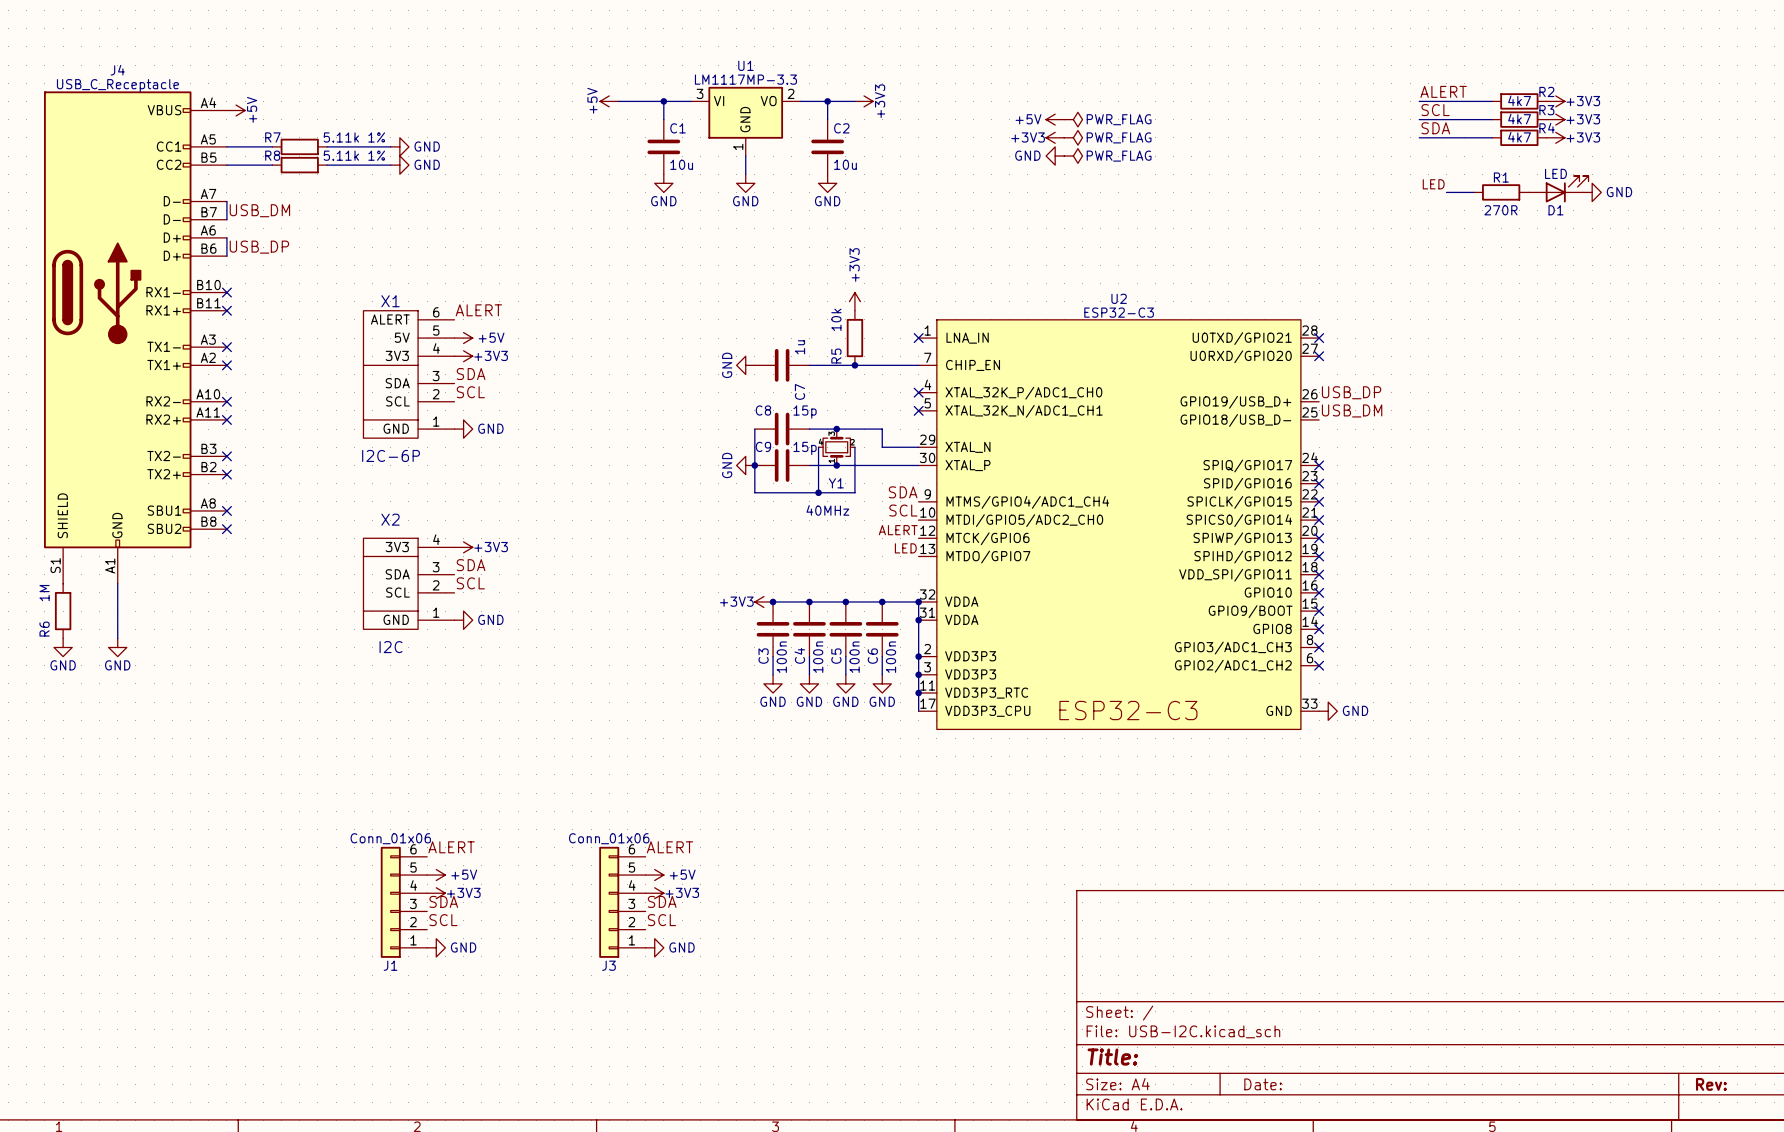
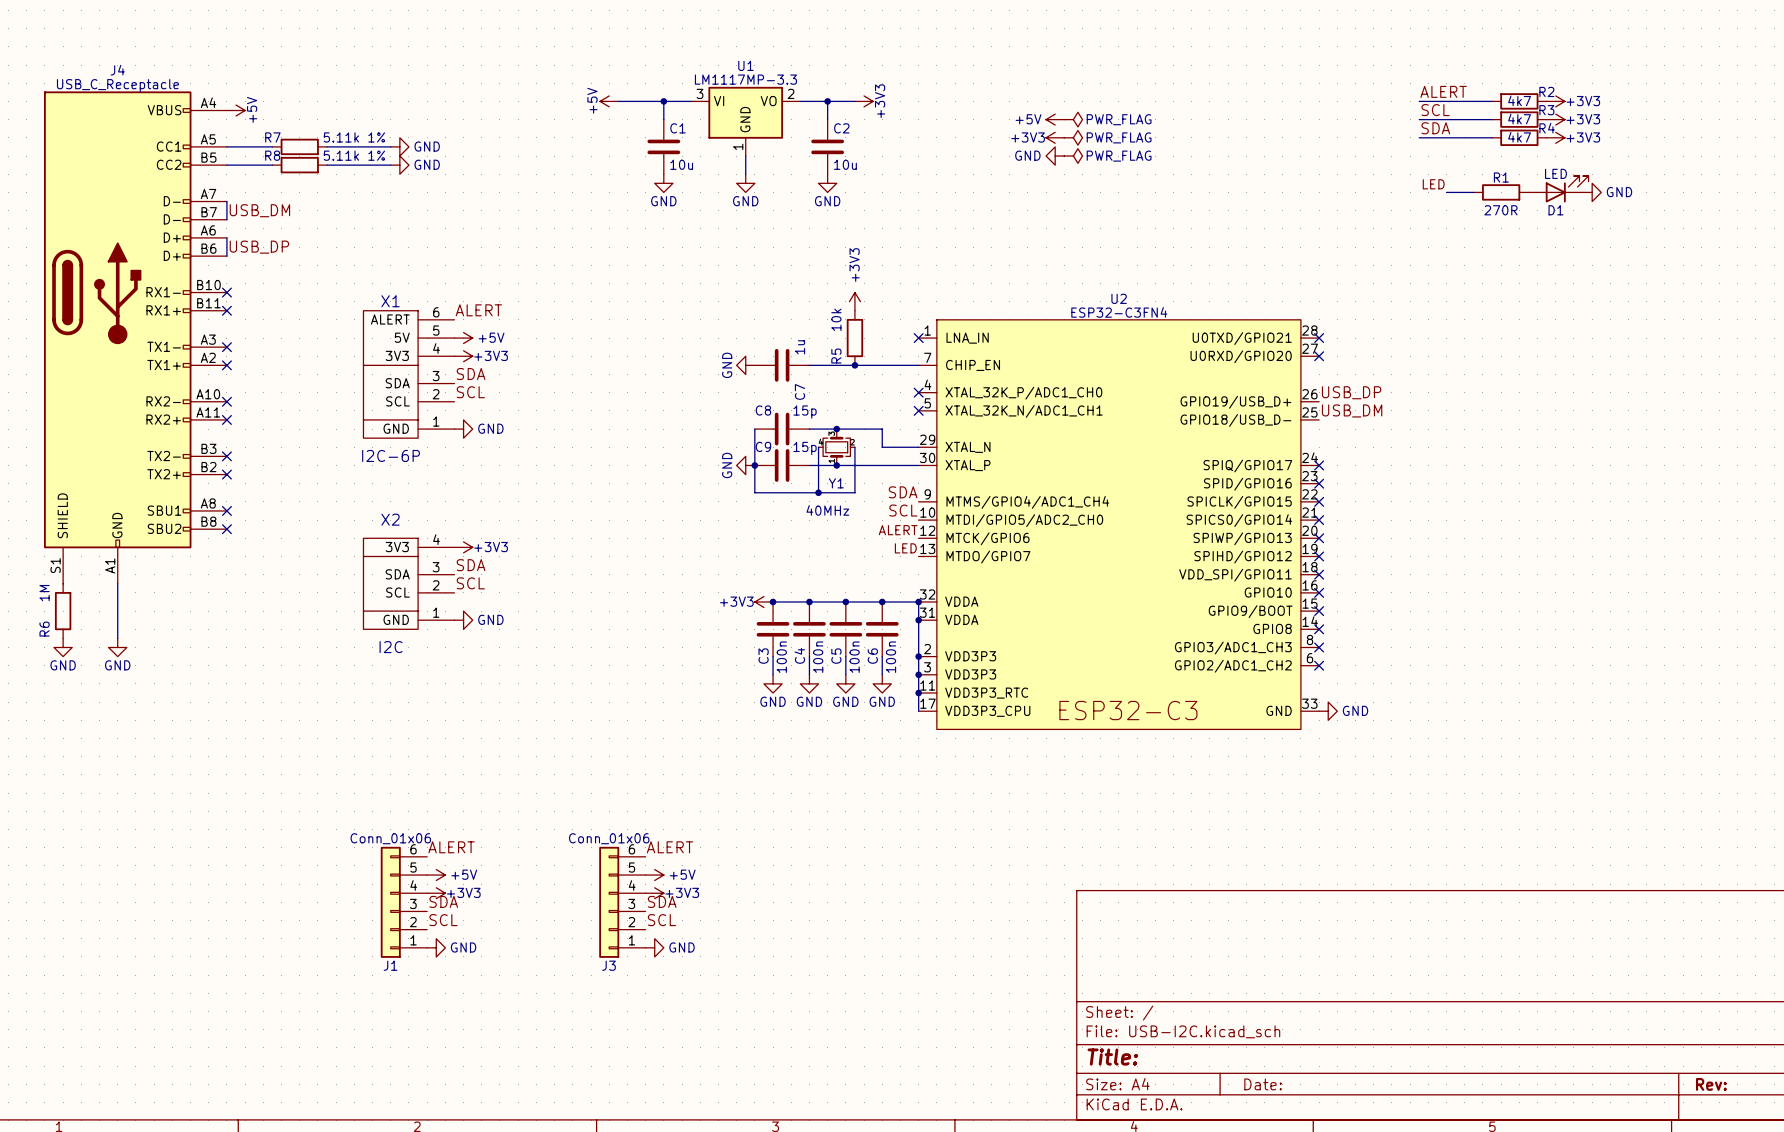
U2 value: ESP32-C3 (1119, 312) -> ESP32-C3FN4 (1119, 312)

